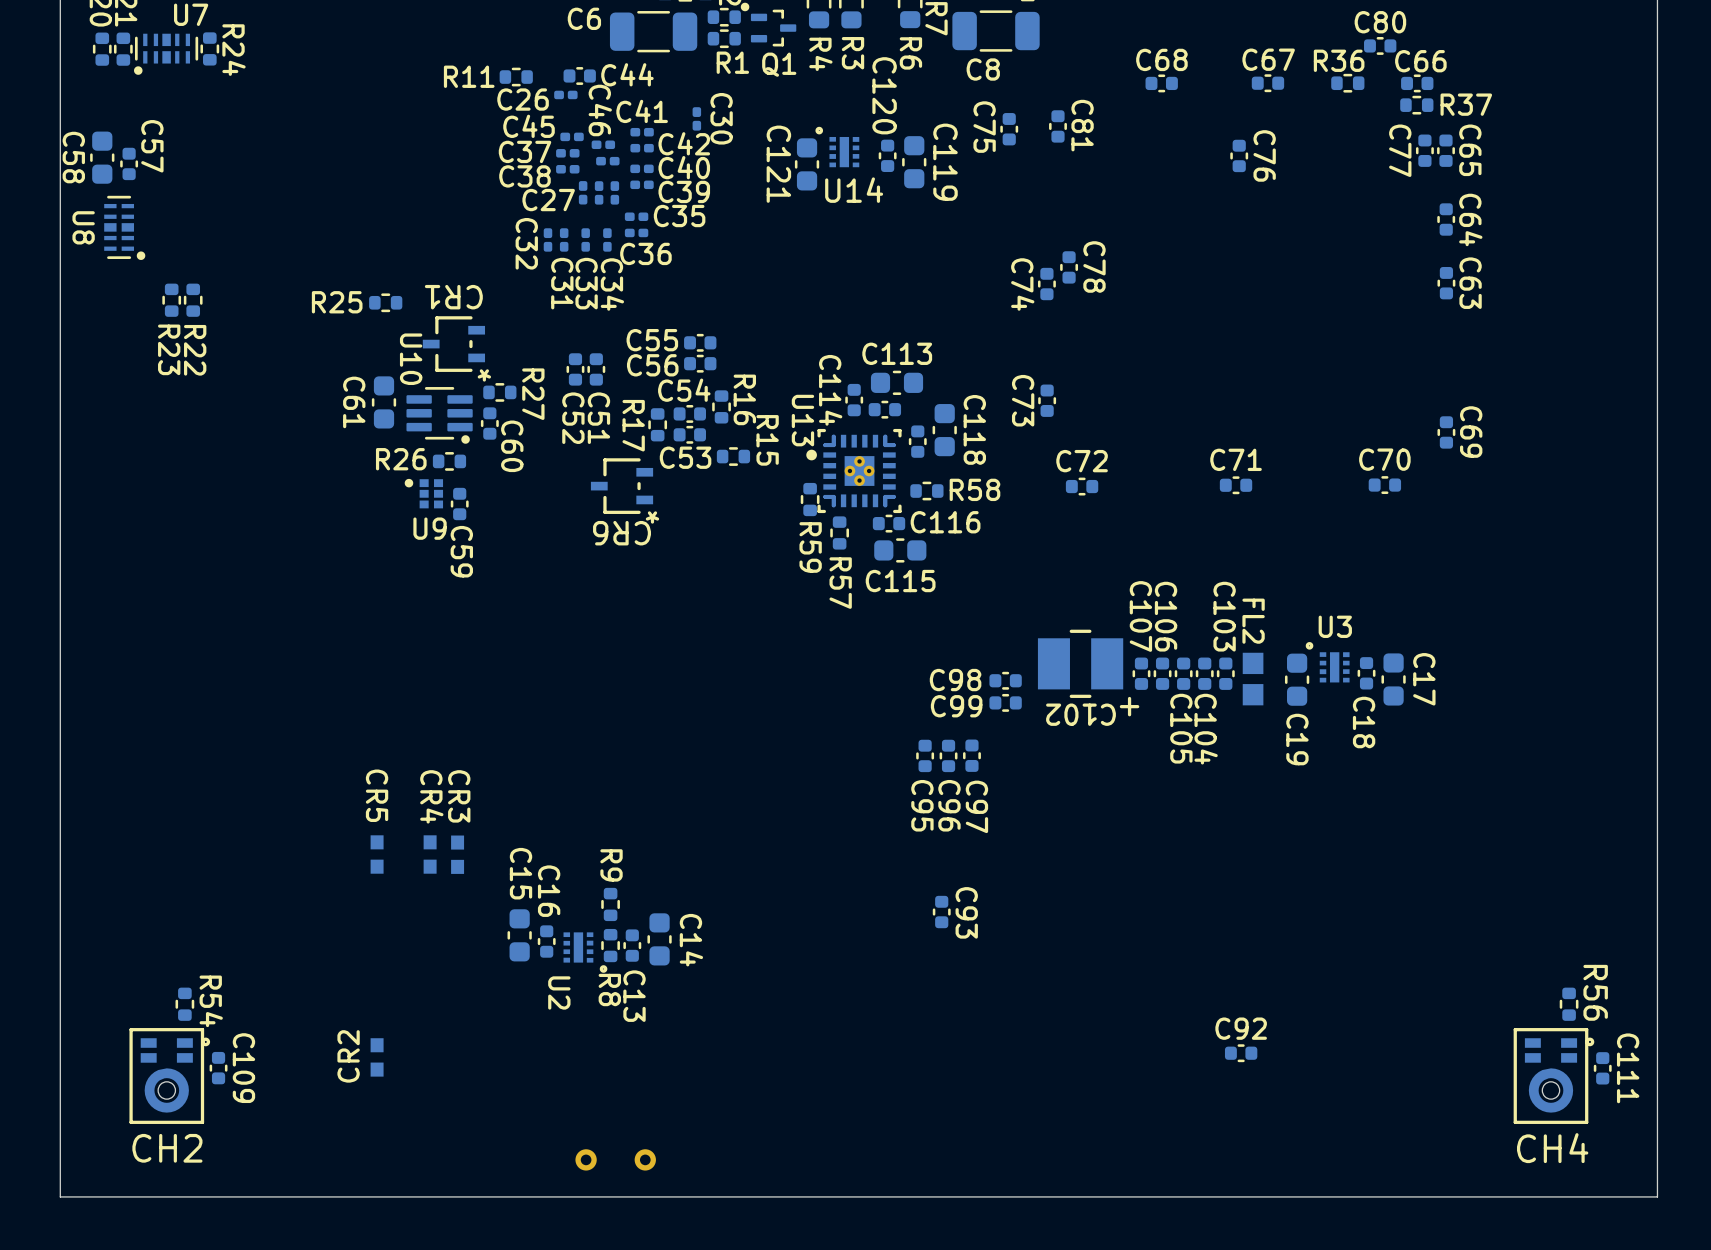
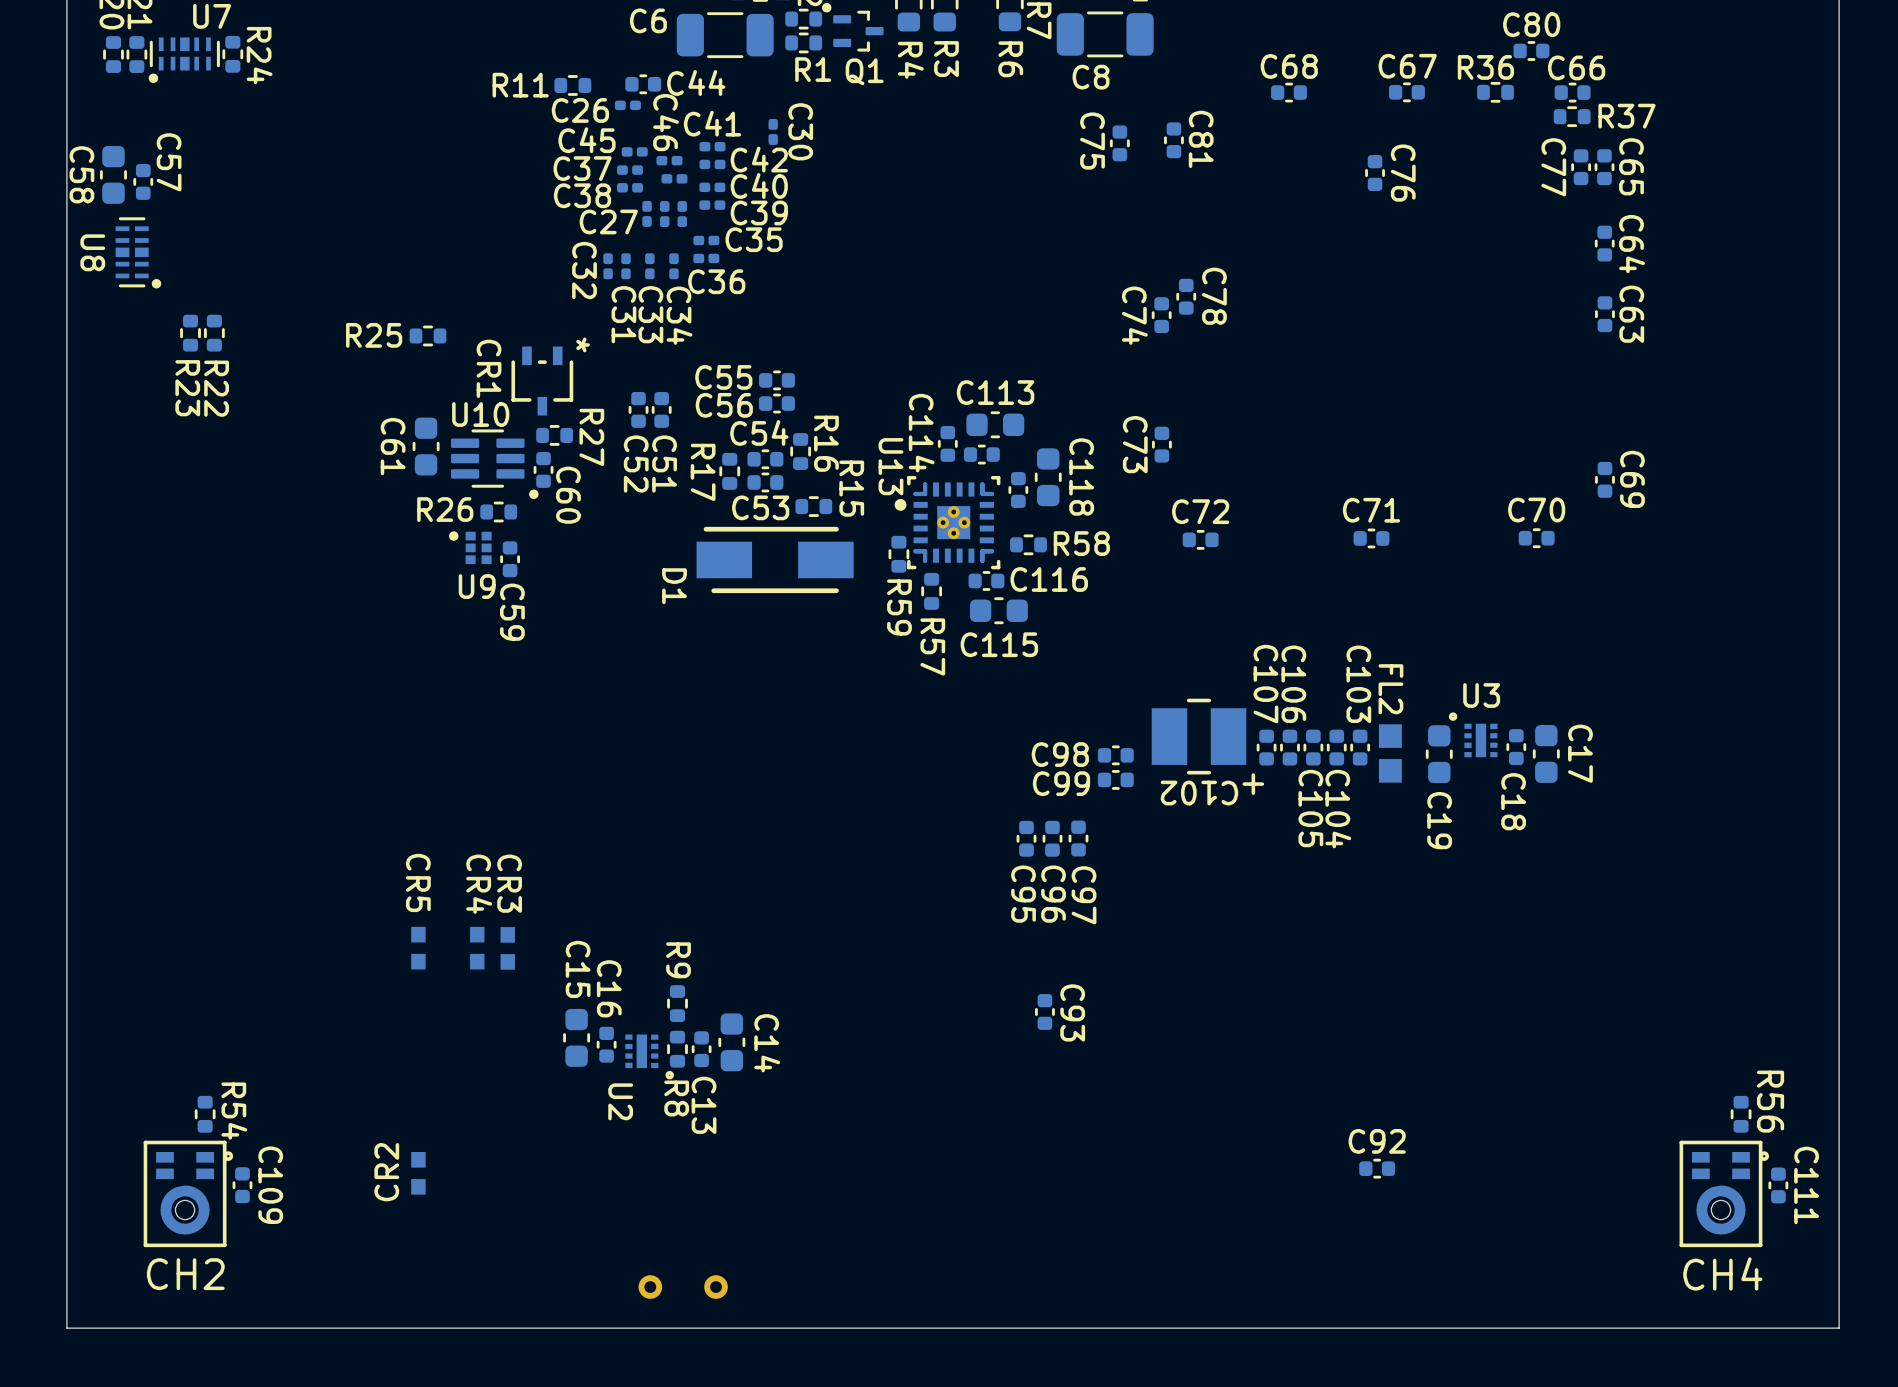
U14: (837, 147) -> none
C120: (887, 155) -> none
C119: (914, 162) -> none
C121: (807, 164) -> none
CR1 name position: CR1 (453, 297) -> CR1 (489, 368)
CR1 footprint: [422, 316, 486, 372] -> [511, 346, 574, 416]
U10 name rotation: 0° (411, 359) -> 90° counterclockwise (480, 414)
U10 footprint: [406, 387, 473, 444] -> [451, 429, 539, 499]
CR6: (622, 486) -> none
D1: none -> (775, 559)

